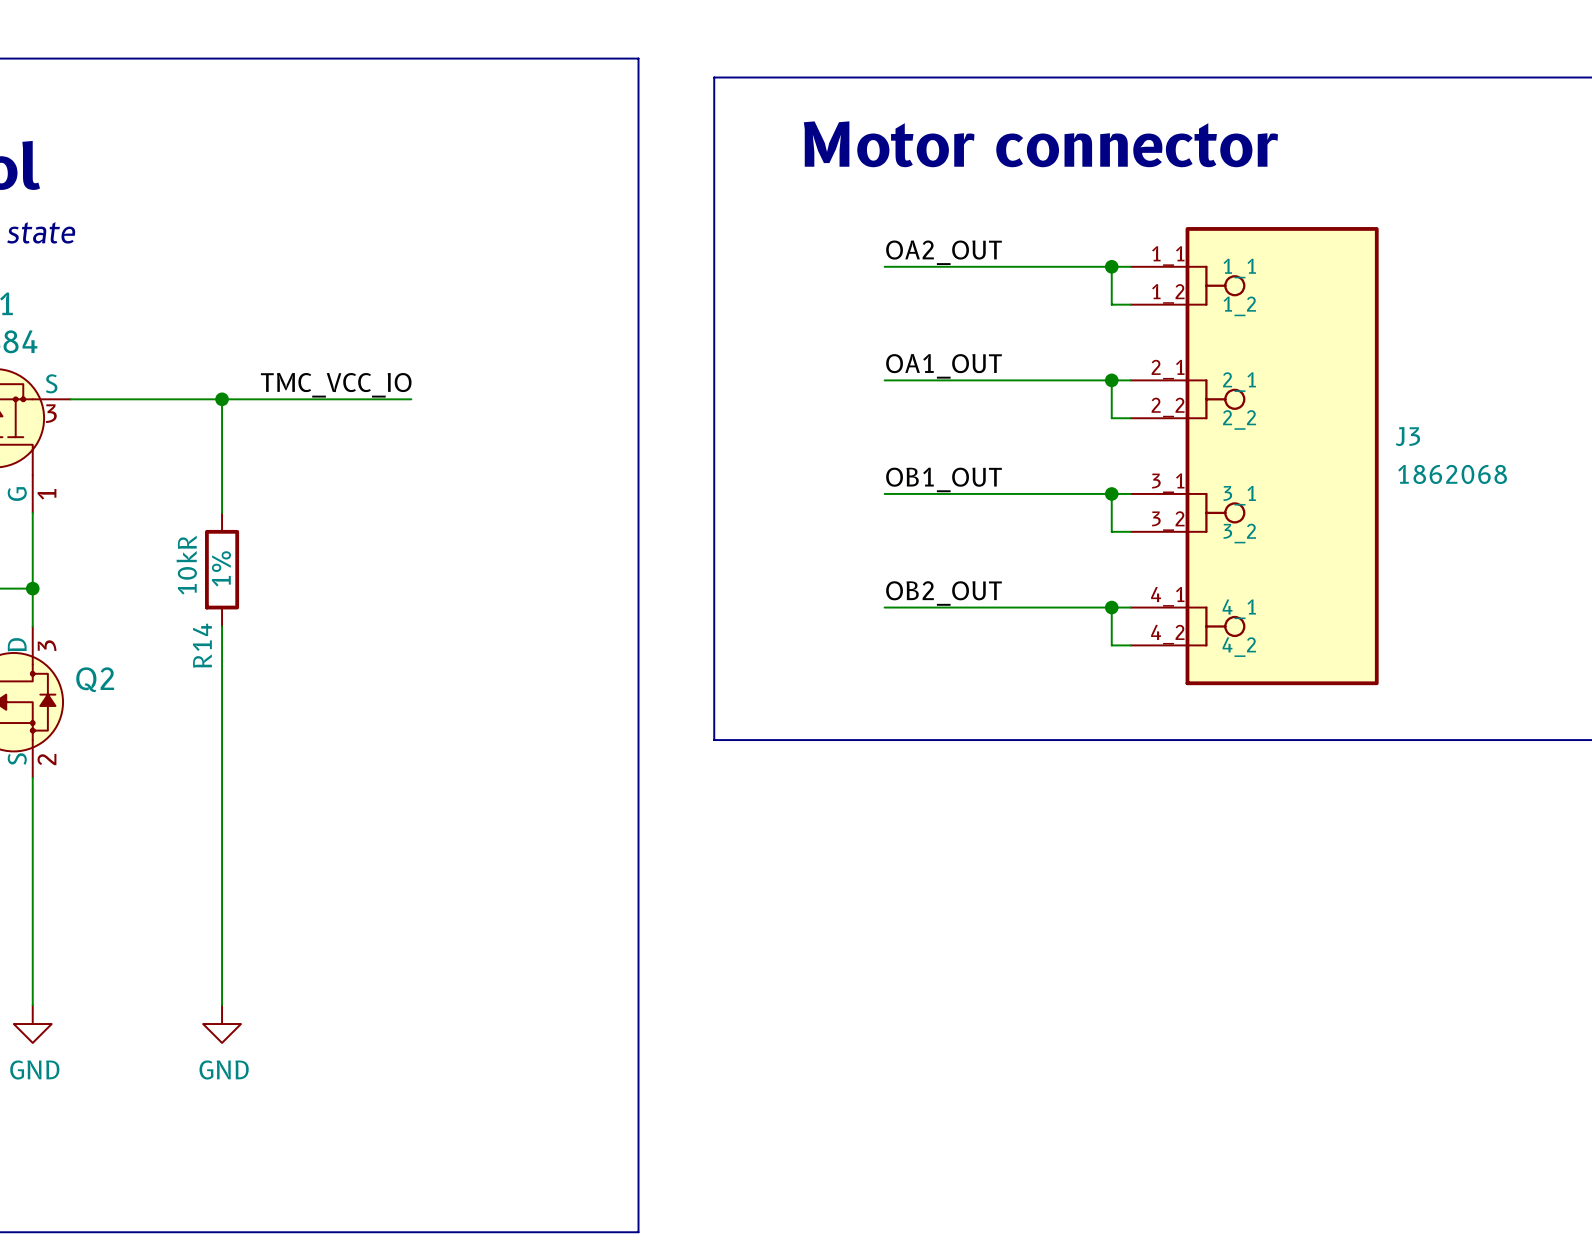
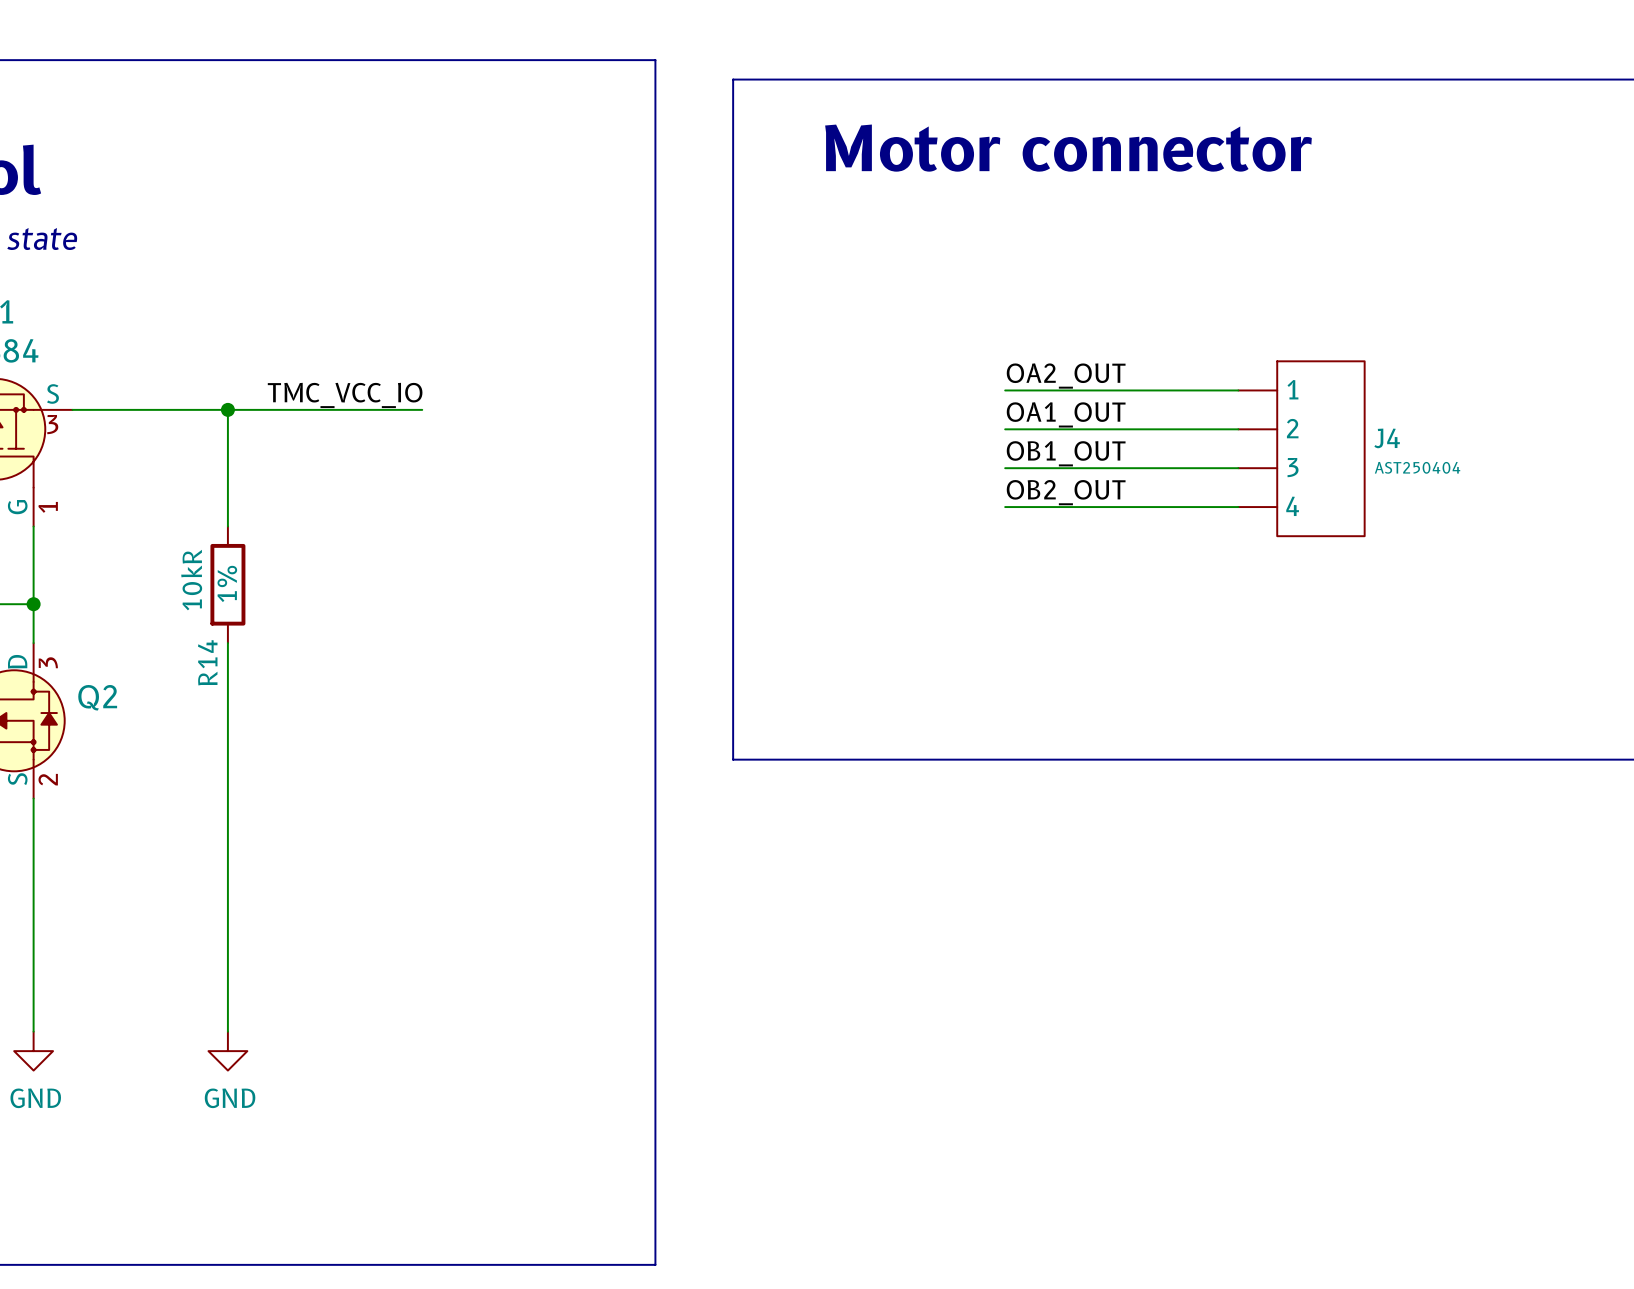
label position: OA2_OUT (944, 252) -> OA2_OUT (1066, 376)
wire: (884, 266) (1130, 266) -> none
wire: (1111, 266) (1111, 304) (1130, 304) -> none
junction: (1111, 266) -> none
label position: OA1_OUT (944, 366) -> OA1_OUT (1066, 414)
wire: (884, 380) (979, 380) -> none
wire: (1111, 380) (1111, 418) -> (1005, 429) (1141, 429)
junction: (1111, 380) -> none
J4: none -> AST250404 (1301, 448)
wire: none -> (1005, 468) (1238, 468)
J3: 1862068 (1254, 456) -> none
label position: OB1_OUT (944, 479) -> OB1_OUT (1066, 453)
wire: (884, 493) (979, 493) -> none
wire: (1111, 493) (1111, 531) (1130, 531) -> none
junction: (1111, 493) -> none
label position: OB2_OUT (944, 593) -> OB2_OUT (1066, 492)
wire: (884, 607) (1130, 607) -> none
wire: (1111, 607) (1111, 645) (1130, 645) -> none
junction: (1111, 607) -> none

